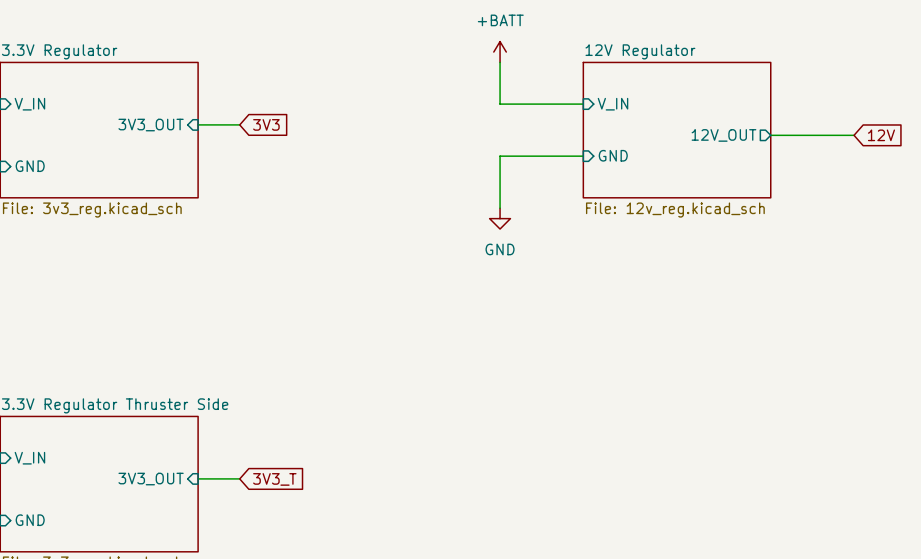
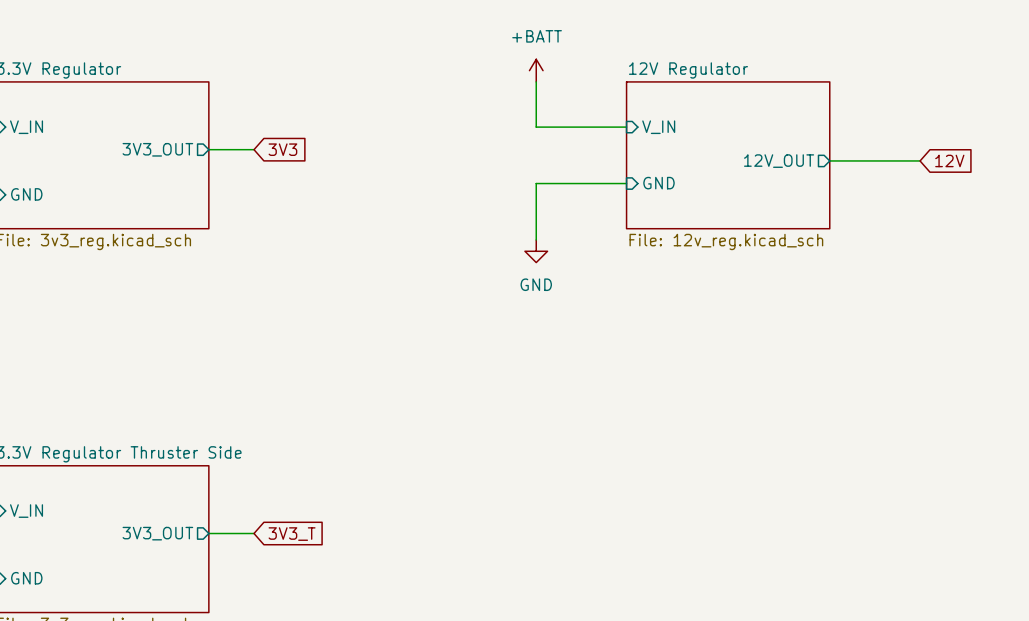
sheet pin shape: input (151, 125) -> output (157, 149)
sheet pin shape: input (151, 479) -> output (157, 533)

